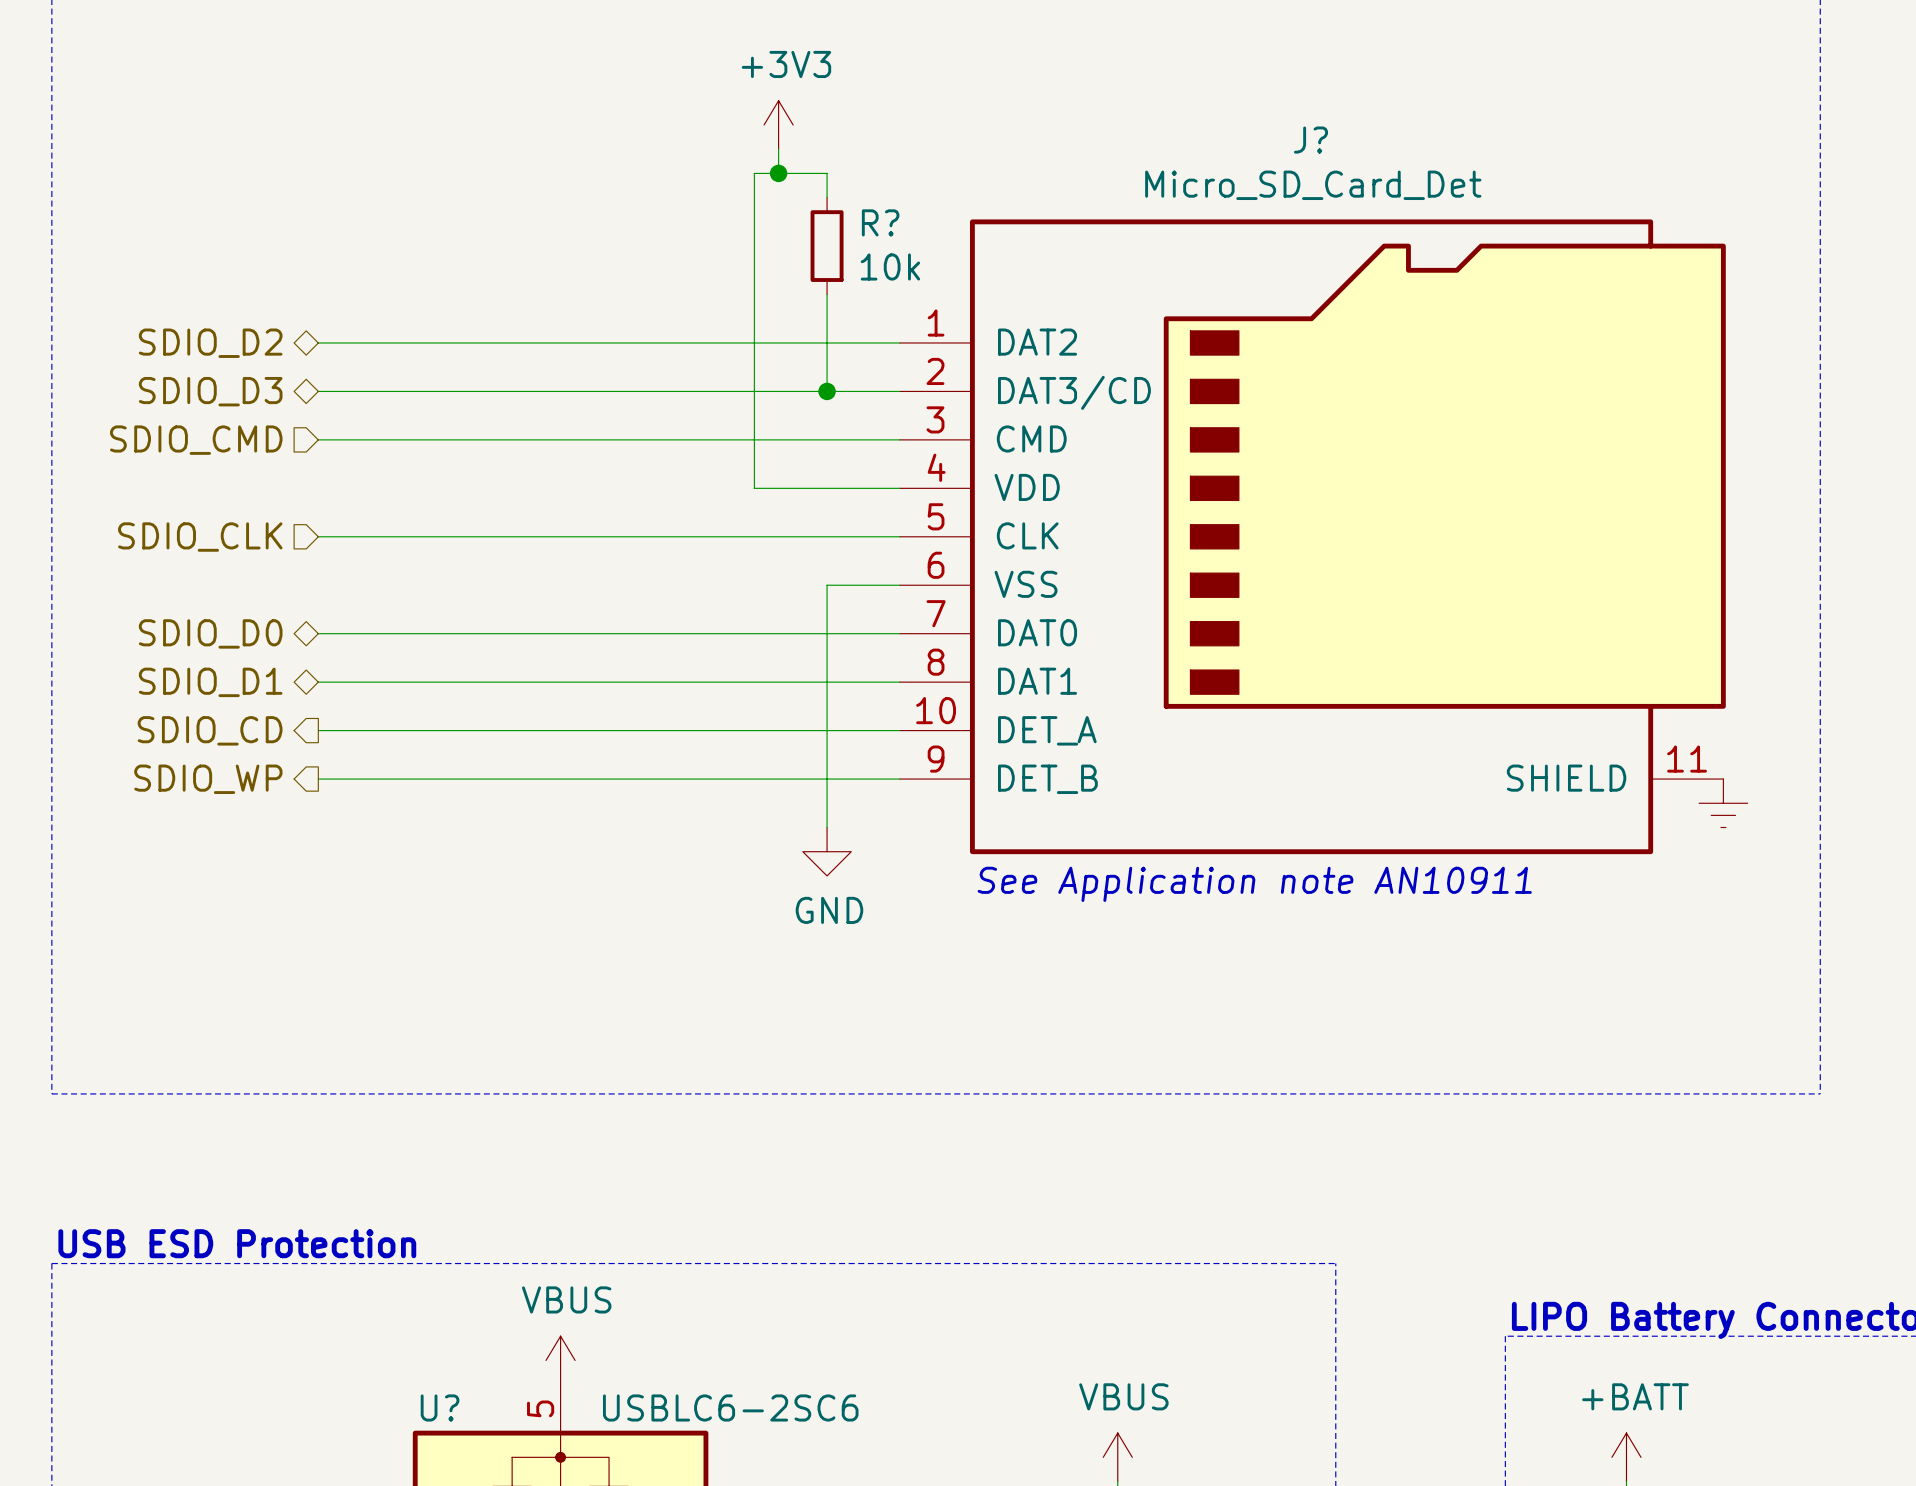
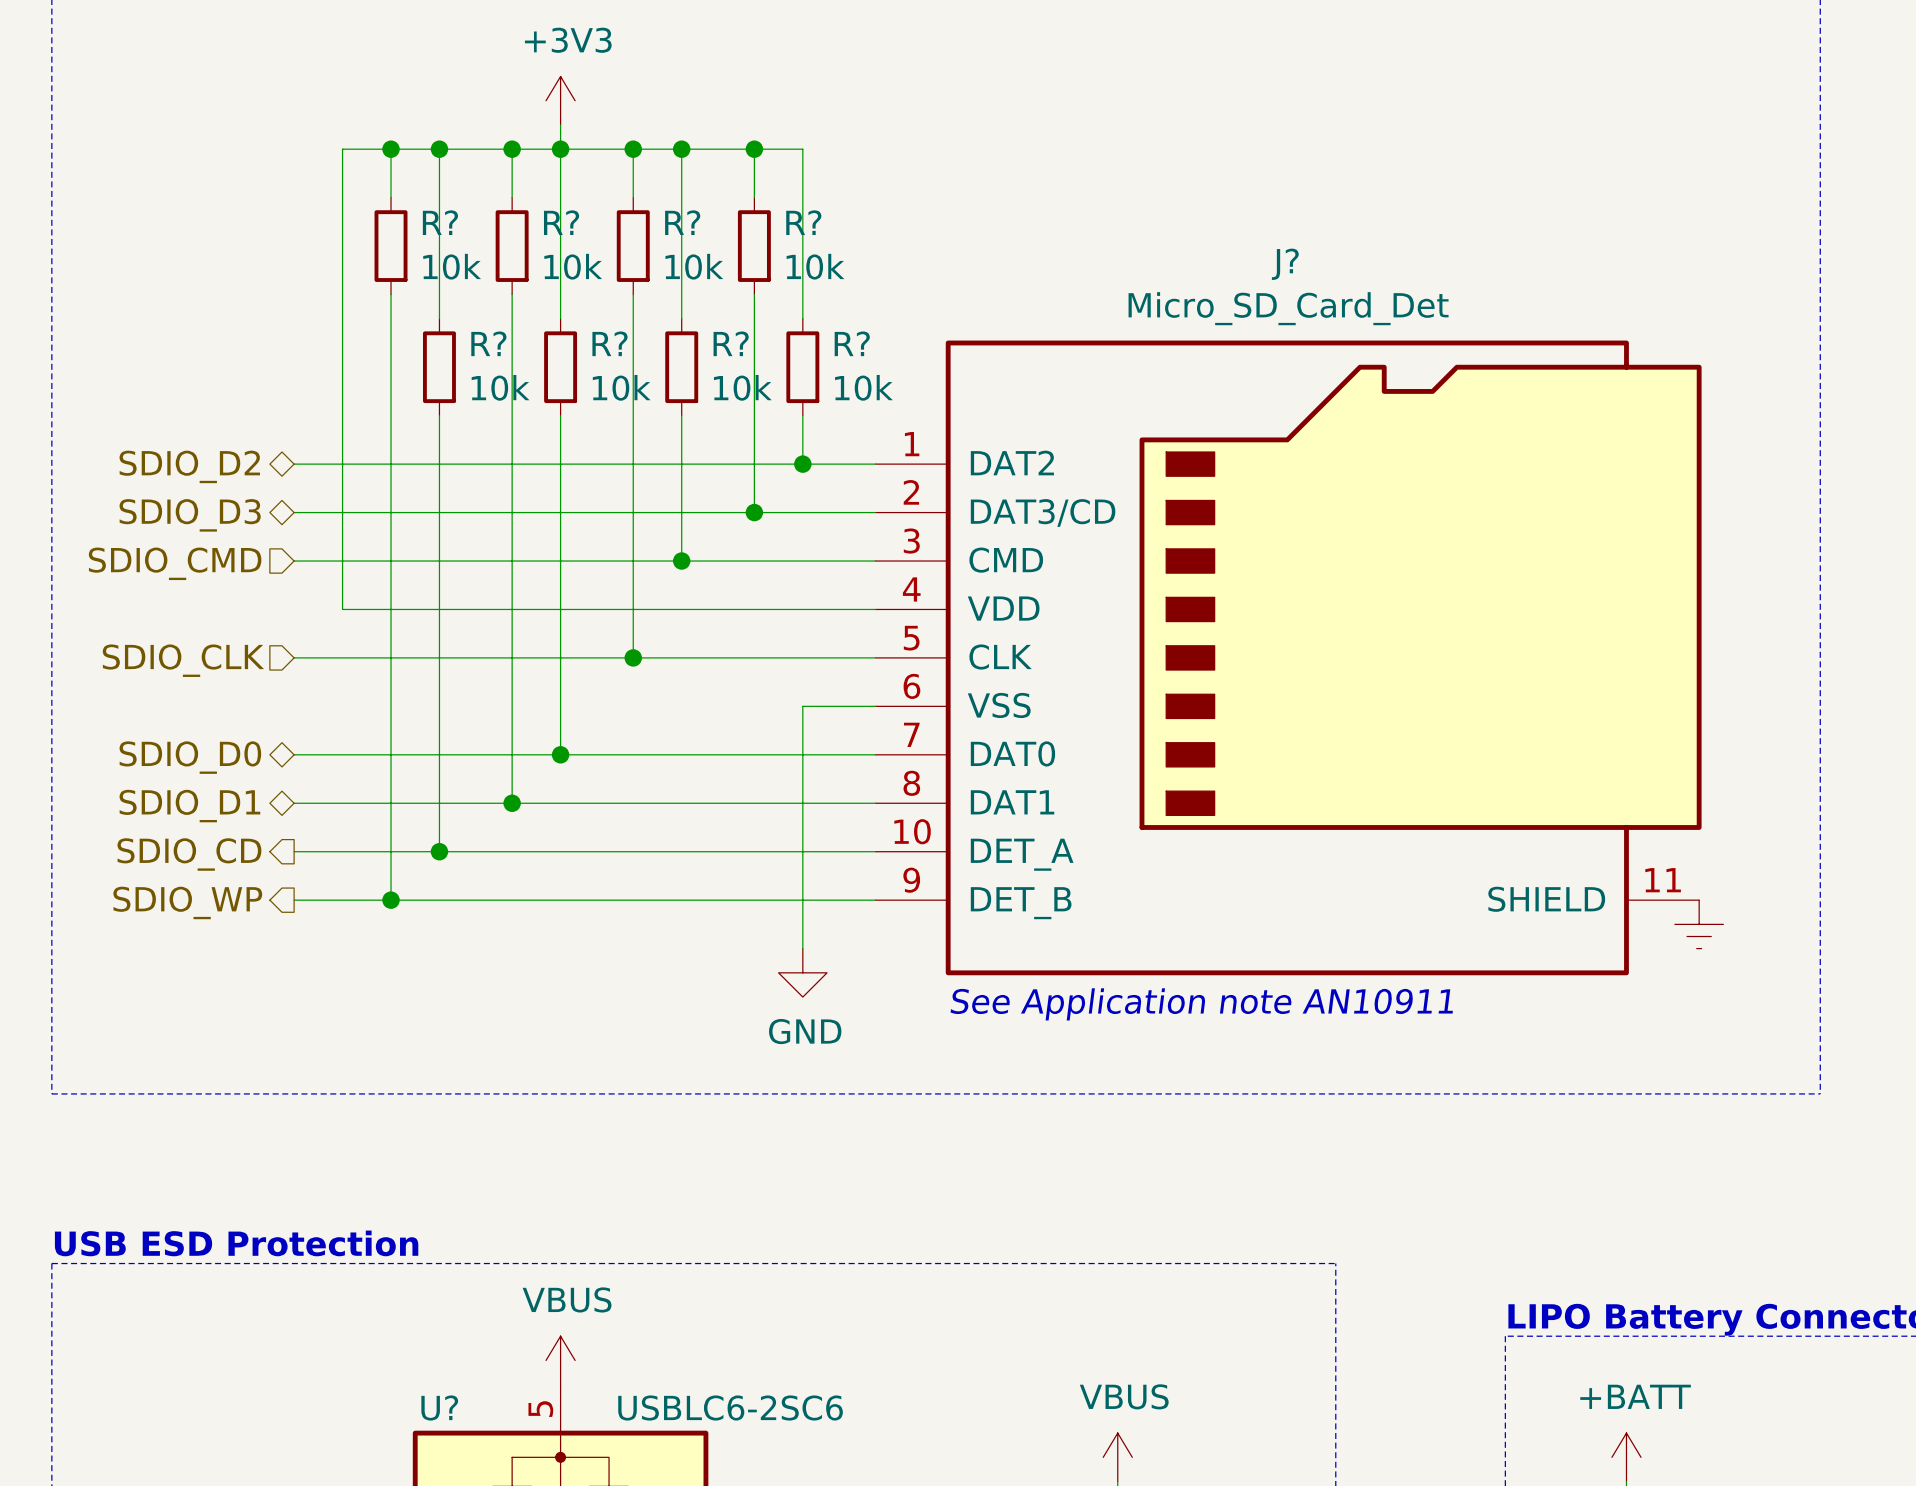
wire: none -> (560, 124) (560, 318)
power symbol position: +3V3 (778, 124) -> +3V3 (560, 100)
wire: none -> (391, 149) (391, 197)
junction: none -> (391, 149)
wire: none -> (439, 149) (439, 318)
junction: none -> (439, 149)
wire: none -> (512, 149) (512, 197)
junction: none -> (512, 149)
junction: none -> (560, 149)
wire: none -> (633, 149) (633, 197)
junction: none -> (633, 149)
wire: none -> (681, 149) (681, 318)
junction: none -> (681, 149)
wire: (778, 149) (778, 173) -> none
wire: (754, 173) (827, 173) (827, 197) -> (754, 173) (754, 149)
junction position: (778, 173) -> (754, 149)
wire: (754, 197) (754, 294) -> none
R?: none -> 10k (391, 246)
R?: none -> 10k (512, 246)
R?: none -> 10k (633, 246)
R?: none -> 10k (754, 246)
R?: 10k (827, 246) -> none
wire: none -> (391, 294) (391, 900)
wire: none -> (512, 294) (512, 803)
wire: none -> (633, 294) (633, 657)
wire: (827, 294) (827, 391) -> none
wire: none -> (802, 318) (802, 149) (342, 149) (342, 609) (875, 609)
wire: (318, 342) (899, 342) -> (294, 464) (875, 464)
hierarchical label position: SDIO_D2 (210, 343) -> SDIO_D2 (189, 466)
R?: none -> 10k (439, 367)
R?: none -> 10k (560, 367)
R?: none -> 10k (681, 367)
R?: none -> 10k (802, 367)
hierarchical label position: SDIO_D3 (210, 391) -> SDIO_D3 (190, 515)
wire: (318, 391) (899, 391) -> (294, 512) (875, 512)
junction: (827, 391) -> none
wire: none -> (439, 415) (439, 851)
wire: none -> (560, 415) (560, 754)
wire: none -> (681, 415) (681, 561)
wire: none -> (802, 415) (802, 464)
wire: (318, 439) (899, 439) -> (294, 561) (875, 561)
hierarchical label position: SDIO_CMD (196, 440) -> SDIO_CMD (175, 563)
junction: none -> (802, 464)
wire: (754, 488) (899, 488) -> (754, 488) (754, 512)
junction: none -> (754, 512)
wire: (318, 536) (899, 536) -> (294, 657) (875, 657)
J? position: (1312, 536) -> (1288, 657)
hierarchical label position: SDIO_CLK (200, 537) -> SDIO_CLK (183, 660)
junction: none -> (681, 561)
wire: (899, 585) (827, 585) (827, 827) -> (875, 706) (802, 706) (802, 948)
hierarchical label position: SDIO_D0 (210, 633) -> SDIO_D0 (190, 757)
wire: (318, 633) (899, 633) -> (294, 754) (875, 754)
junction: none -> (633, 657)
hierarchical label position: SDIO_D1 (210, 682) -> SDIO_D1 (189, 806)
wire: (318, 682) (899, 682) -> (294, 803) (875, 803)
hierarchical label position: SDIO_CD (210, 730) -> SDIO_CD (189, 854)
wire: (318, 730) (899, 730) -> (294, 851) (875, 851)
junction: none -> (560, 754)
hierarchical label position: SDIO_WP (208, 779) -> SDIO_WP (187, 902)
wire: (318, 779) (899, 779) -> (294, 900) (875, 900)
junction: none -> (512, 803)
power symbol position: (1723, 803) -> (1699, 924)
junction: none -> (439, 851)
power symbol position: GND (827, 851) -> GND (802, 972)
text position: See Application note AN10911 (1254, 884) -> See Application note AN10911 (1201, 1004)
junction: none -> (391, 900)

